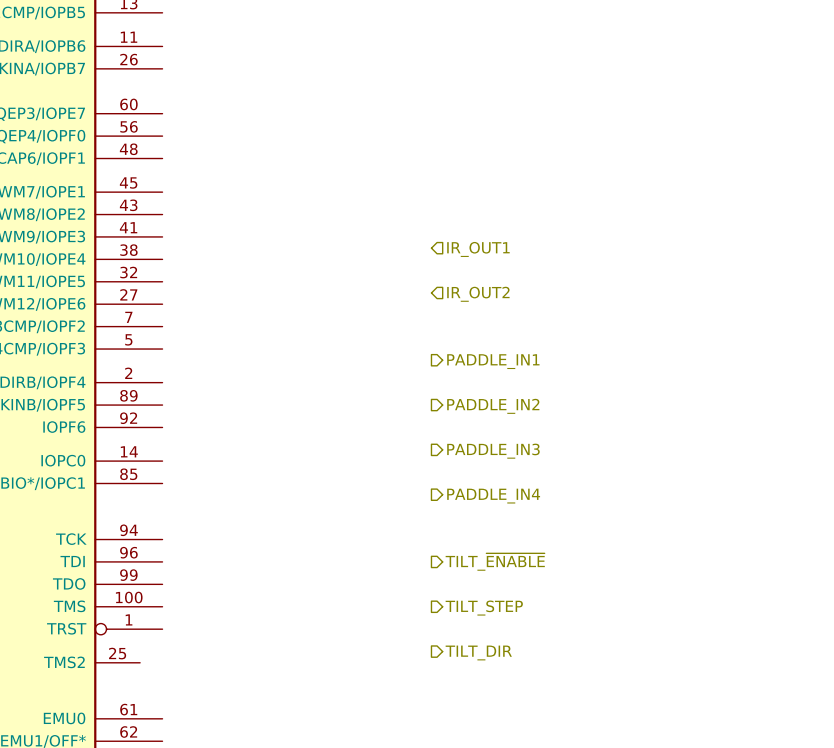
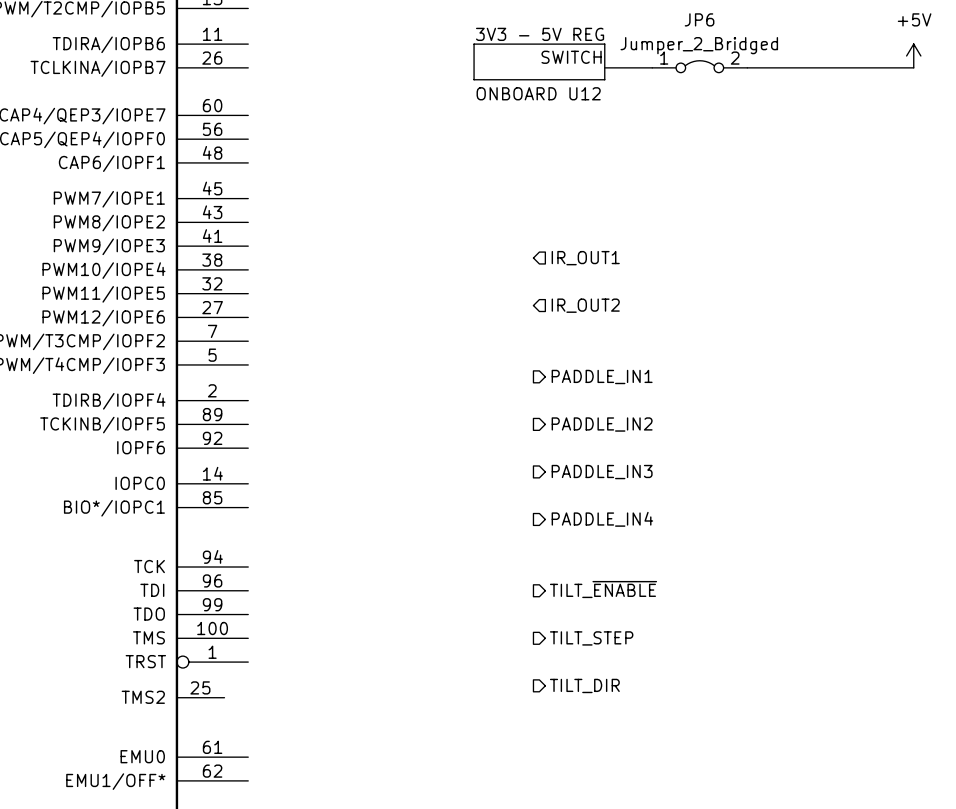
text: none -> 3V3 - 5V REG (540, 34)
line: none -> (474, 44) (474, 79) (604, 79) (604, 44) (474, 44)
power symbol: none -> +5V (913, 55)
label: none -> SWITCH (571, 57)
JP6: none -> Jumper_2_Bridged (699, 66)
wire: none -> (604, 67) (652, 67)
wire: none -> (747, 67) (913, 67)
text: none -> ONBOARD U12 (538, 93)

